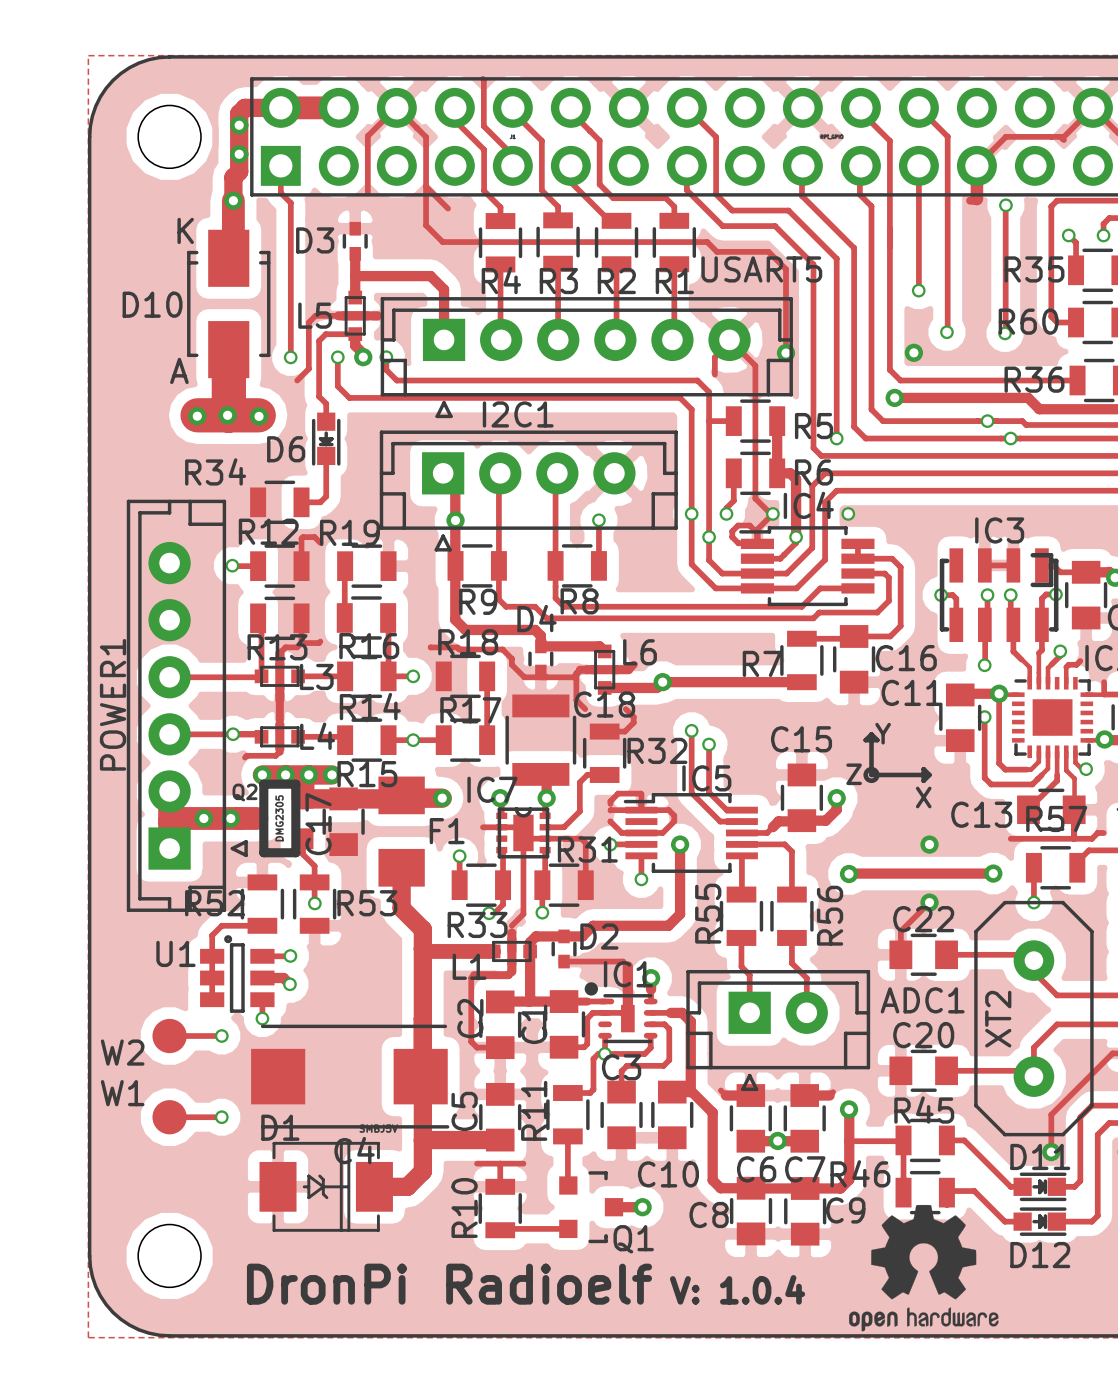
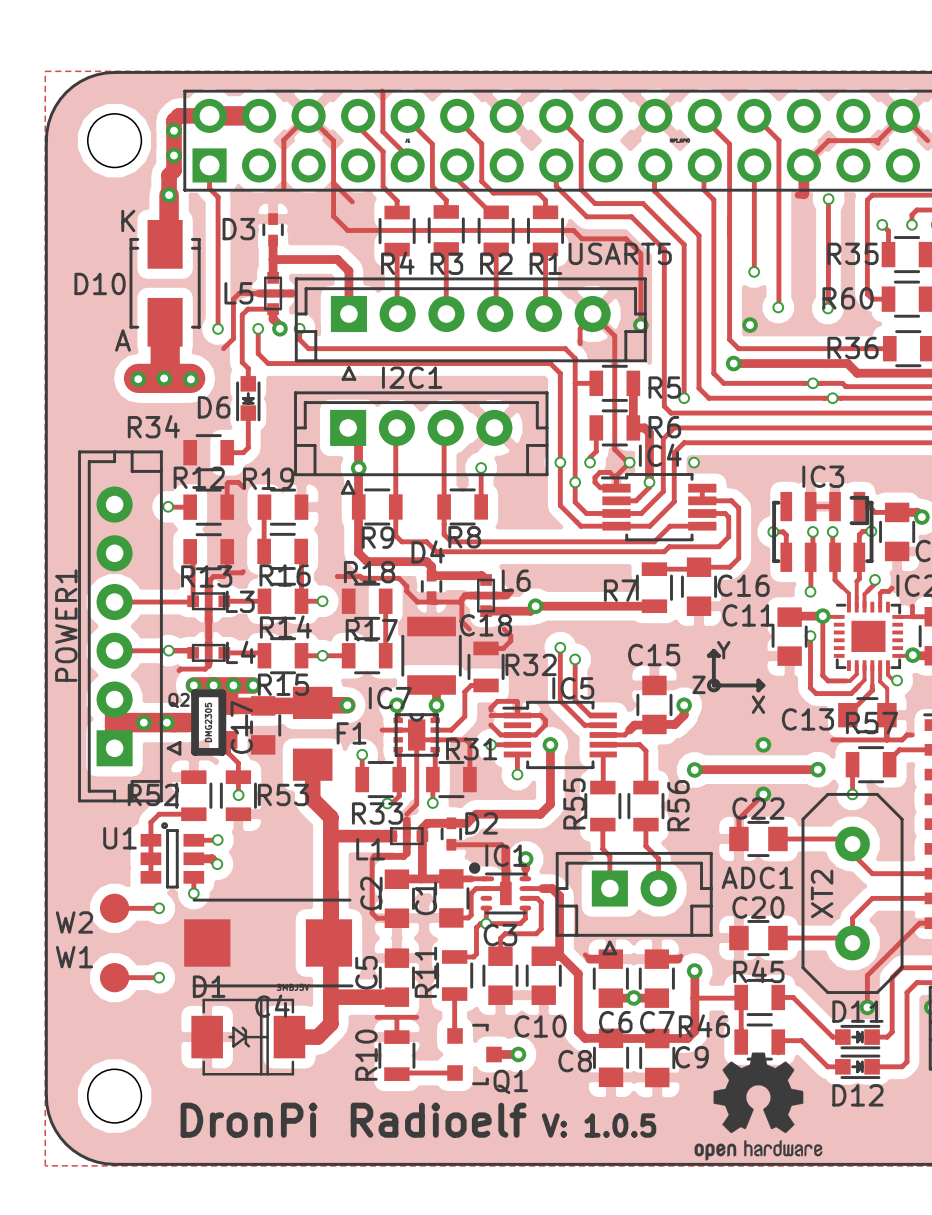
text: V: 1.0.4 (737, 1289) -> V: 1.0.5 (599, 1125)

